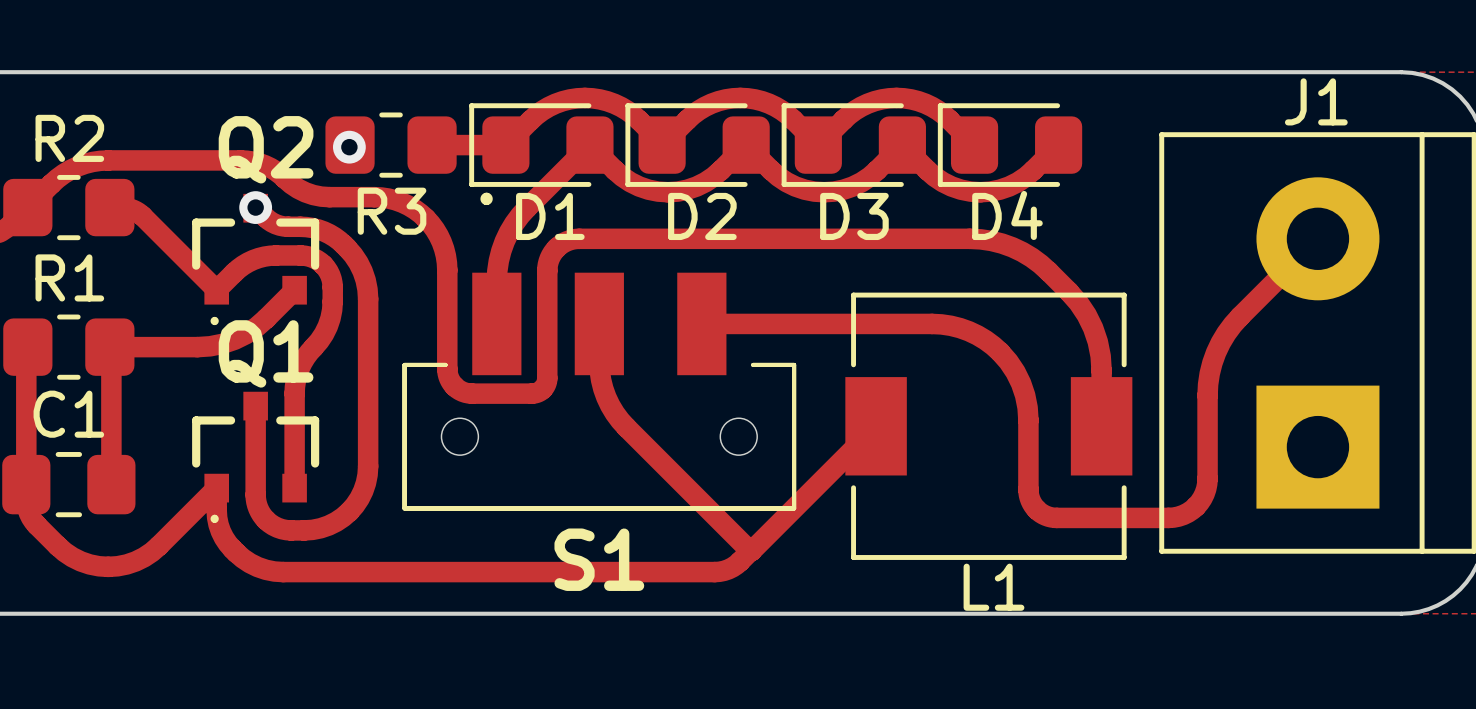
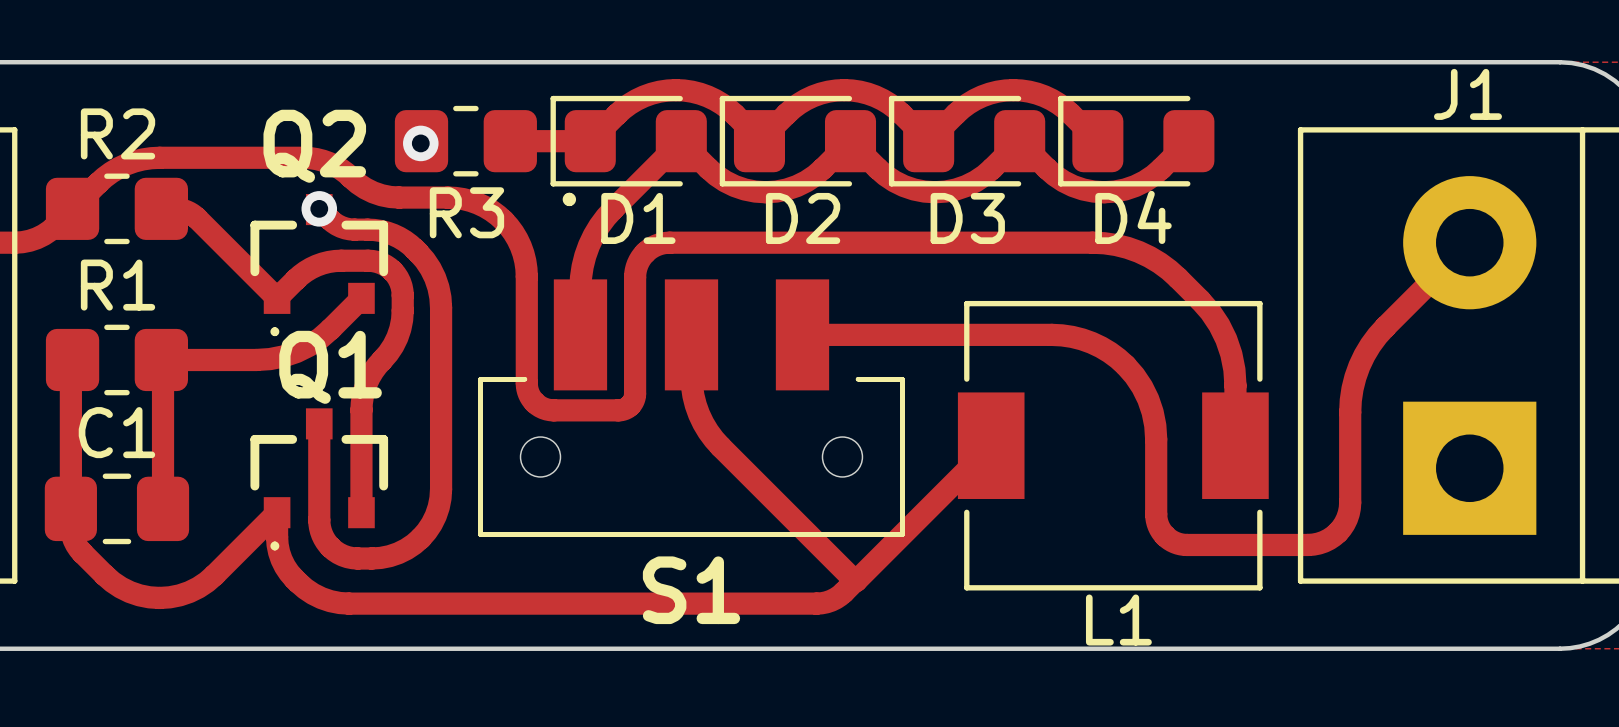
Q2 name position: Q2 (266, 149) -> Q2 (314, 146)

